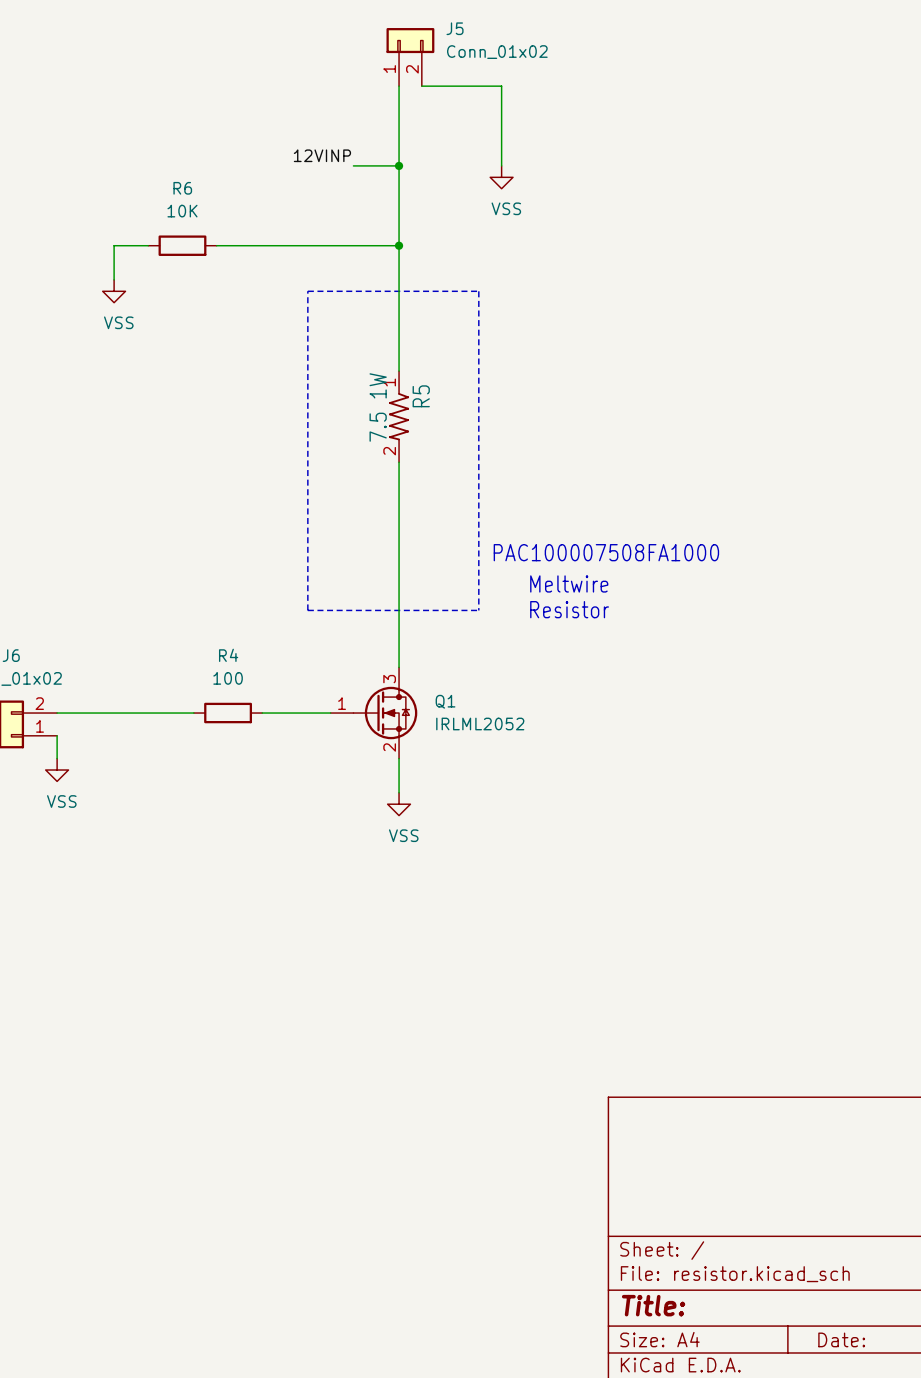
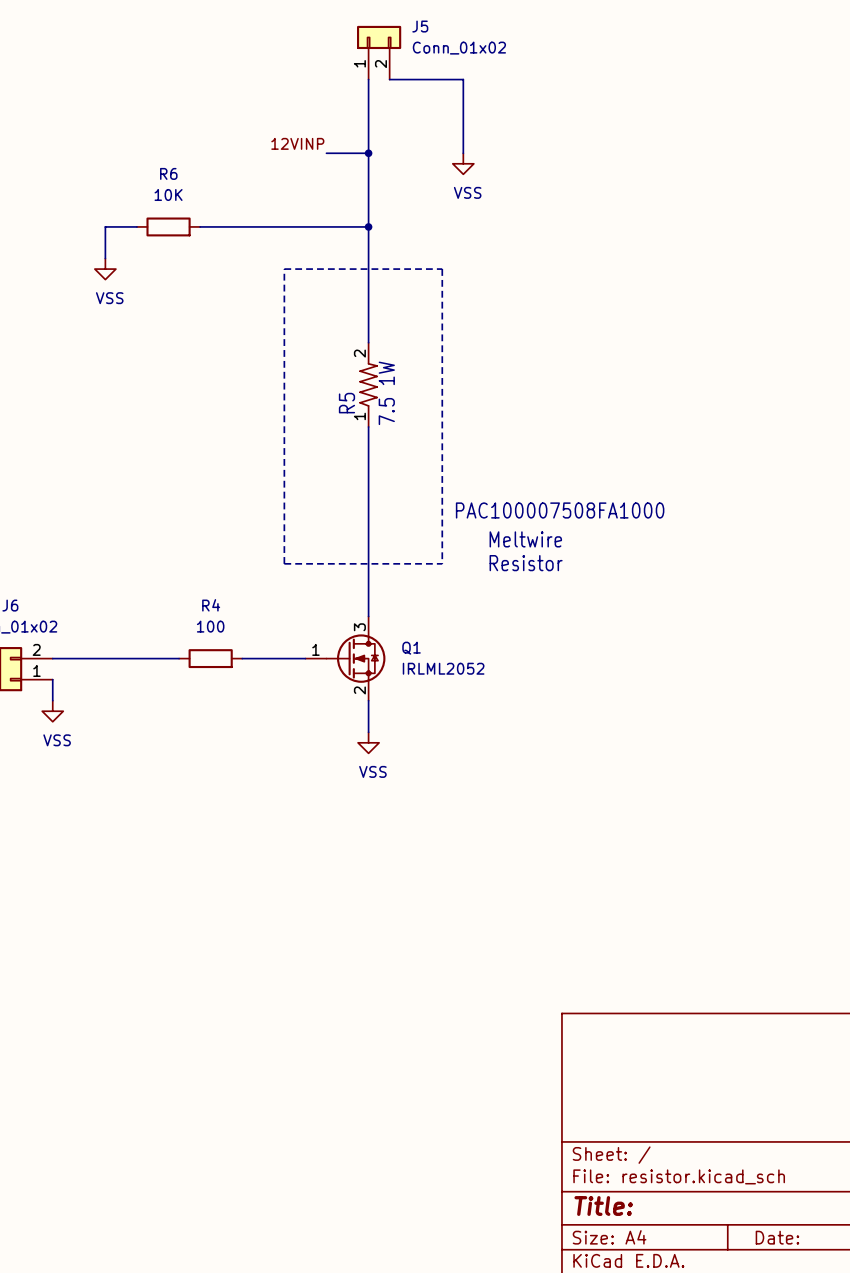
R5 rotation: 0° (399, 416) -> 180° (368, 384)

